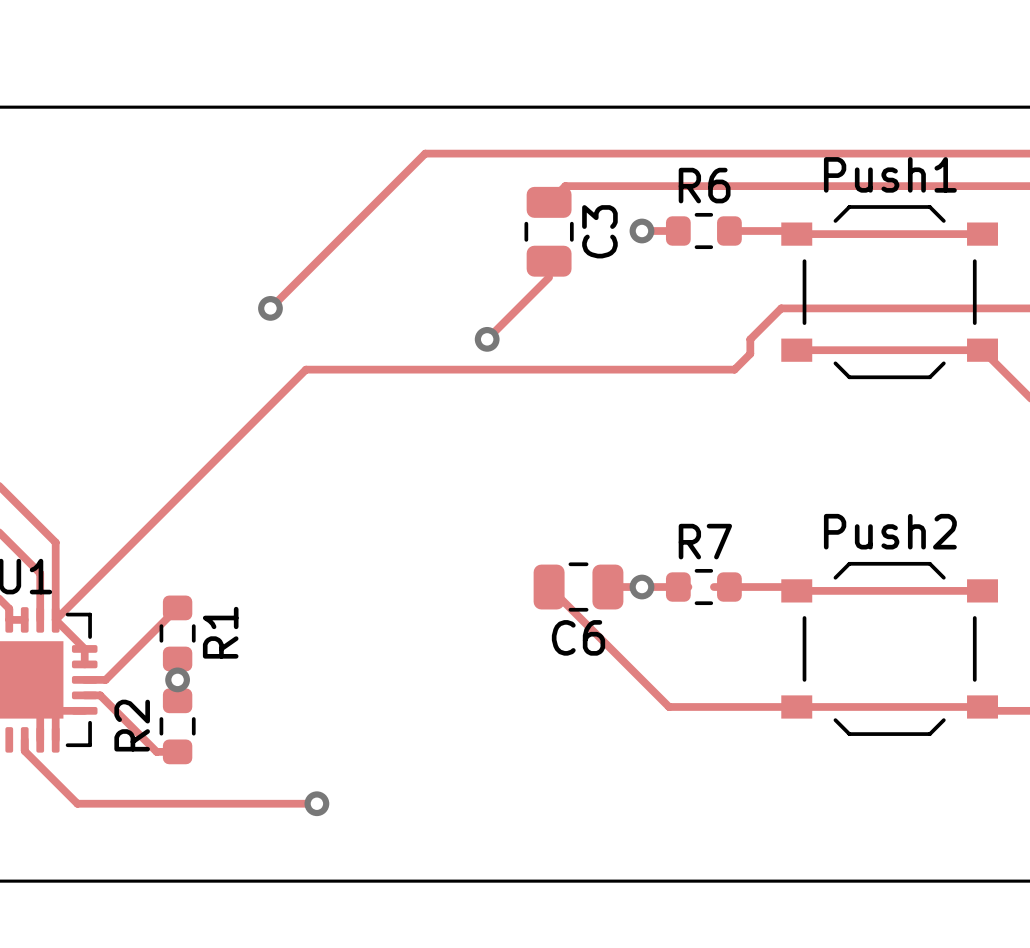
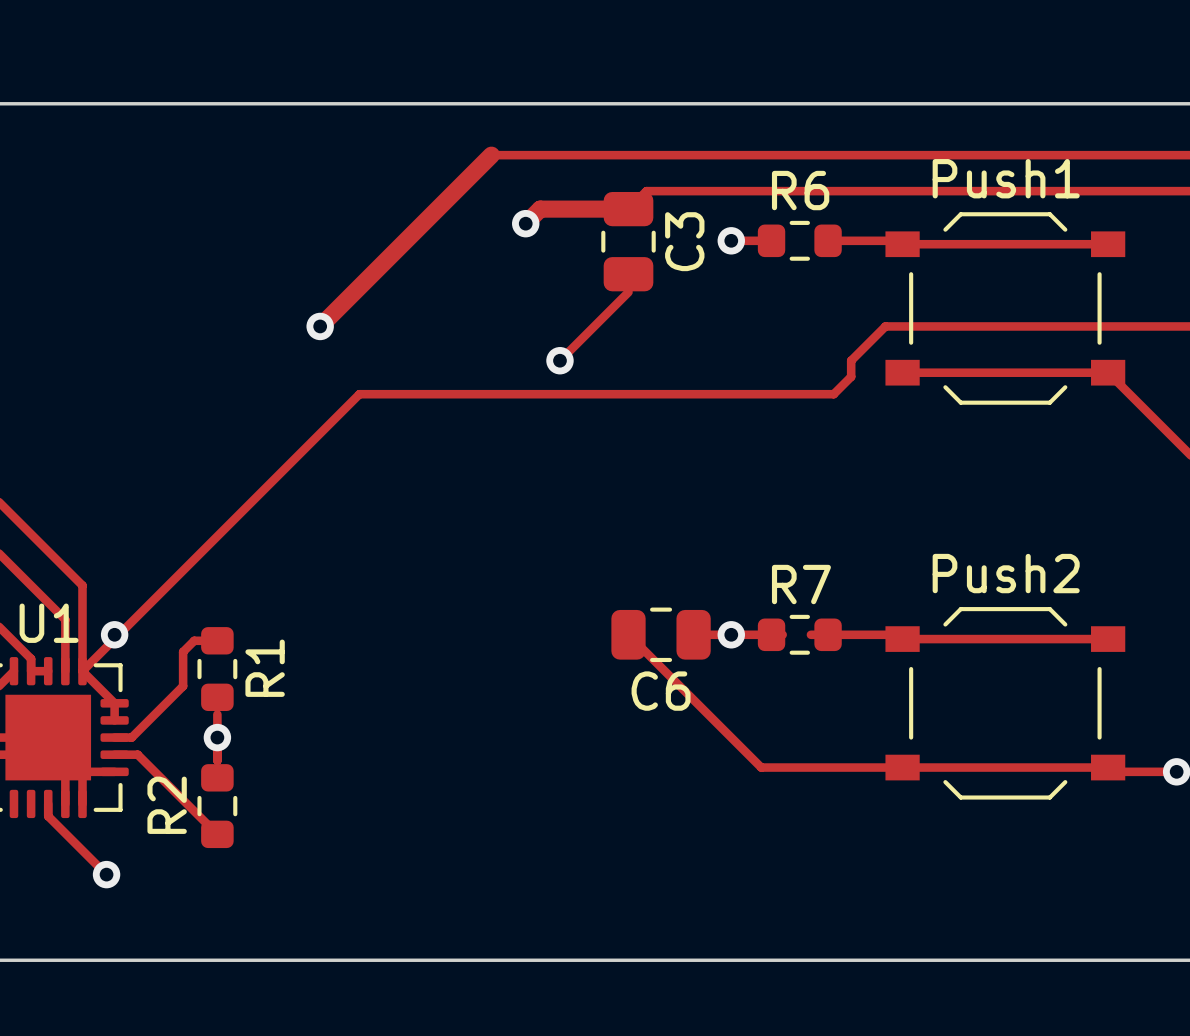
track width: thin (425, 153) (270, 308) -> thick (491, 155) (320, 326)
track: none -> (628, 209) (540, 209) (525, 223)
via: none -> (525, 223)
via: none -> (114, 634)
track: (177, 607) (105, 679) (100, 679) -> (217, 640) (194, 640) (183, 651) (183, 686) (131, 737)
R1 position: (177, 633) -> (217, 669)
track: (100, 695) (156, 751) (177, 751) -> (131, 754) (137, 754) (217, 834)
R2 position: (177, 726) -> (217, 806)
track: (77, 803) (316, 803) -> none
via: none -> (106, 874)
via: (316, 803) -> none

